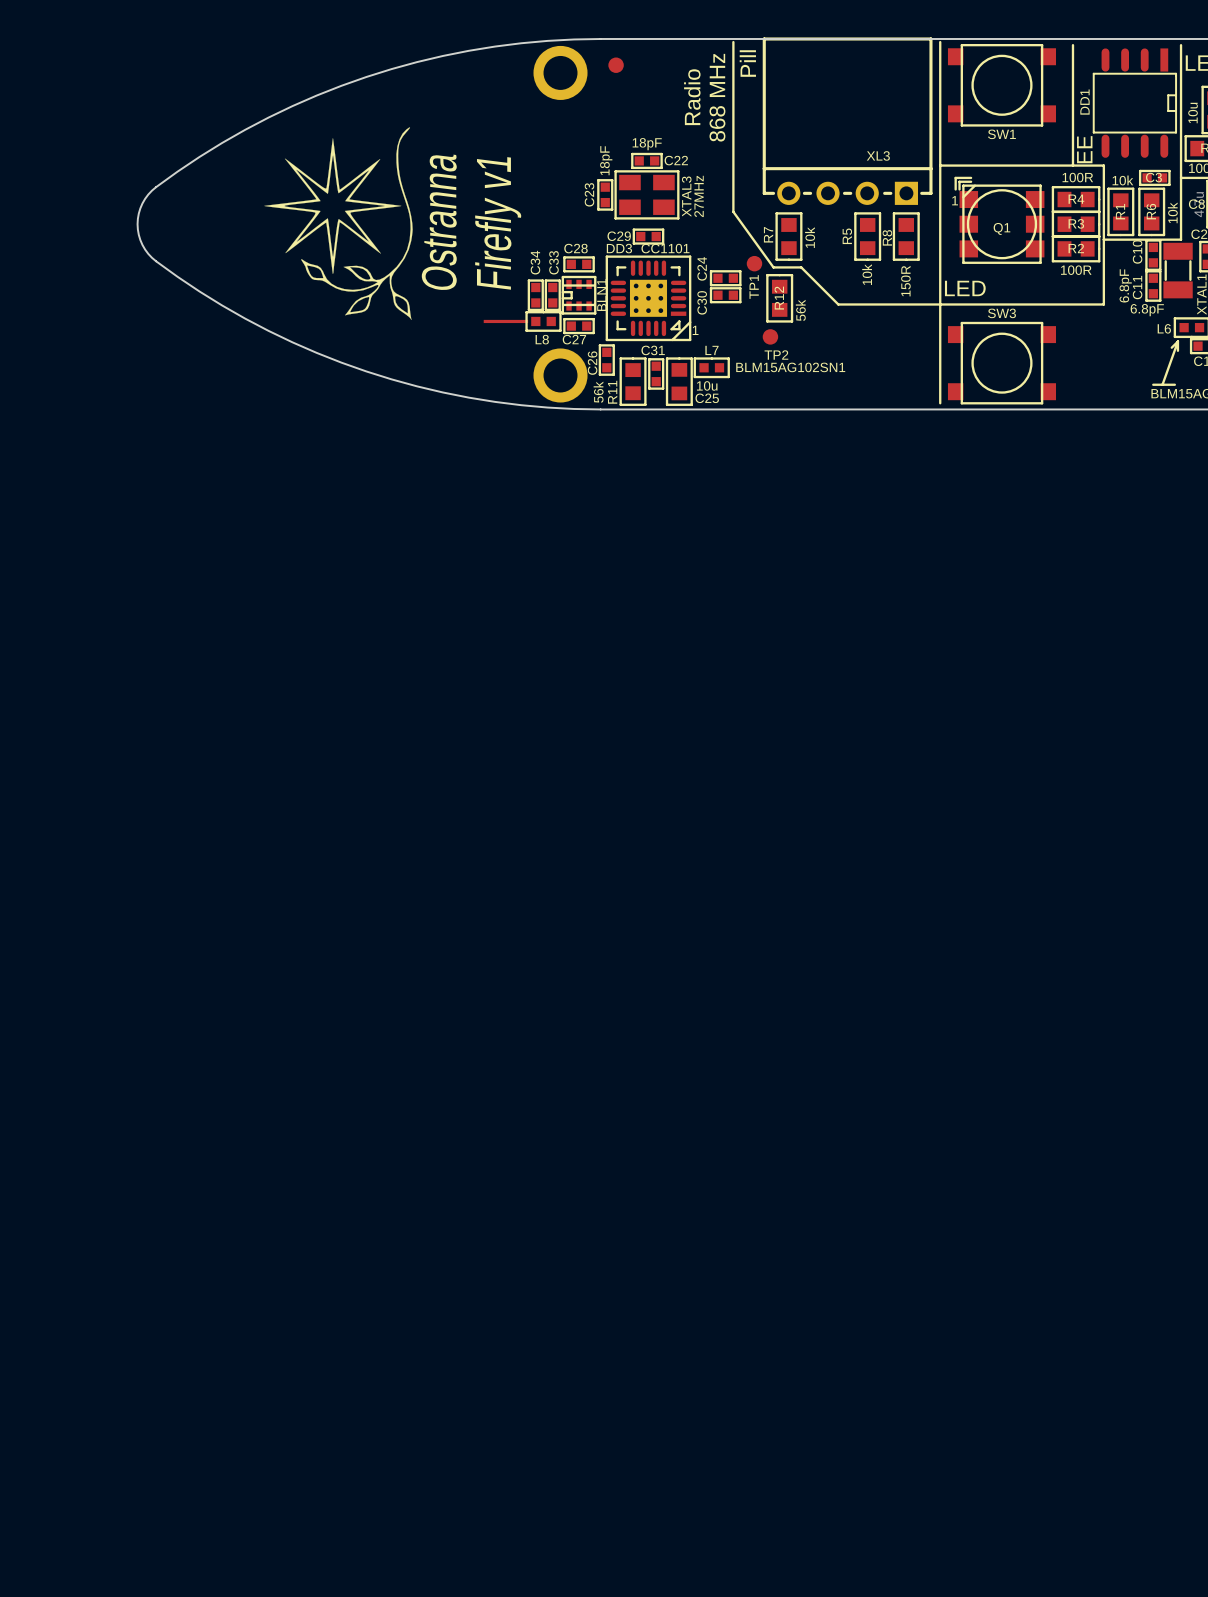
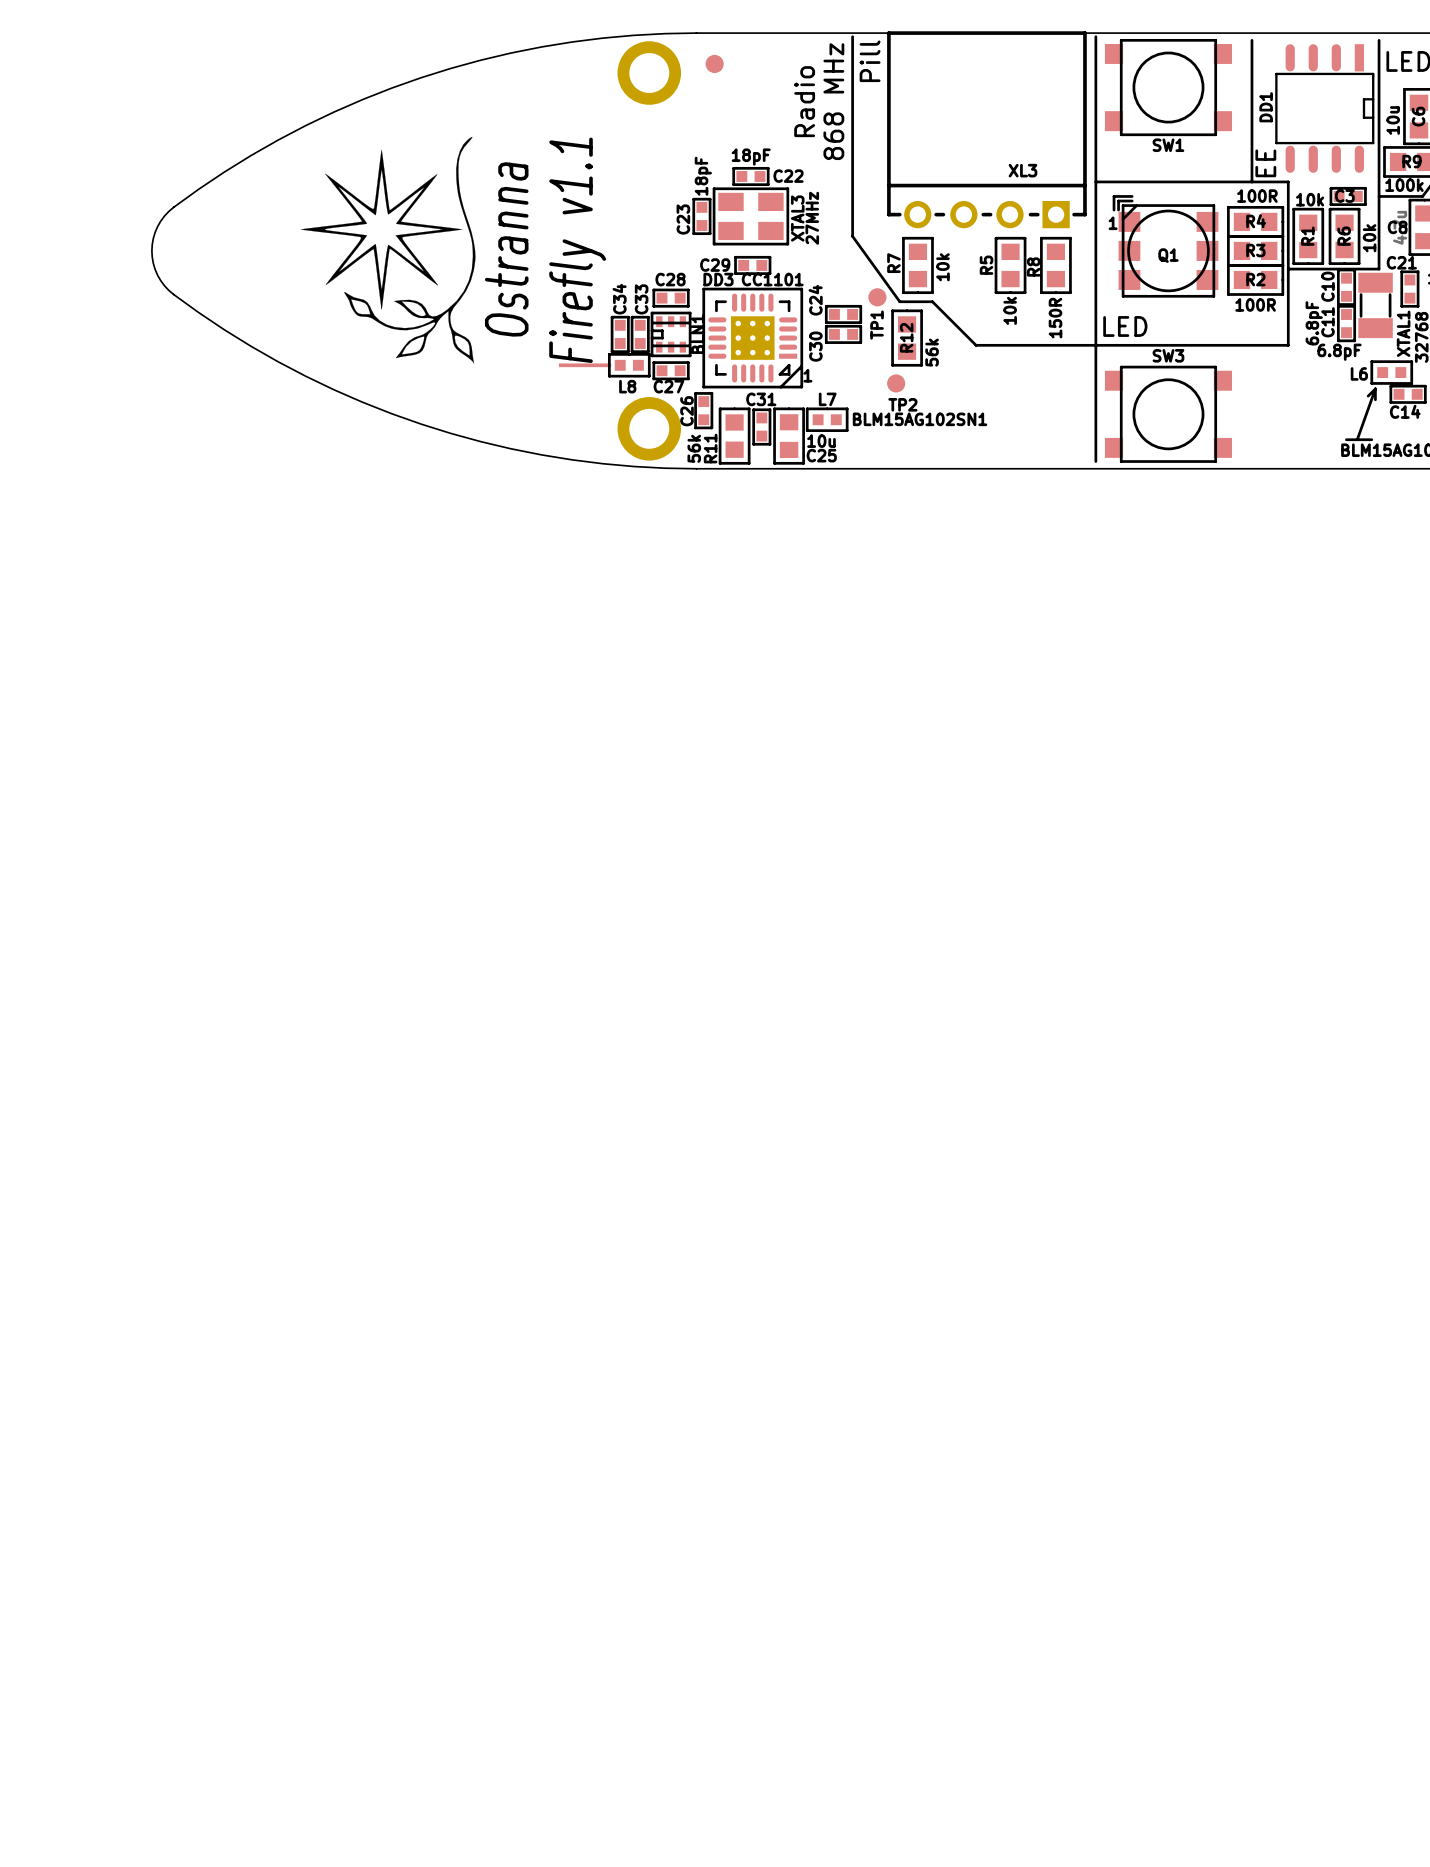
text: Firefly v1 (498, 223) -> Firefly v1.1 (577, 250)

